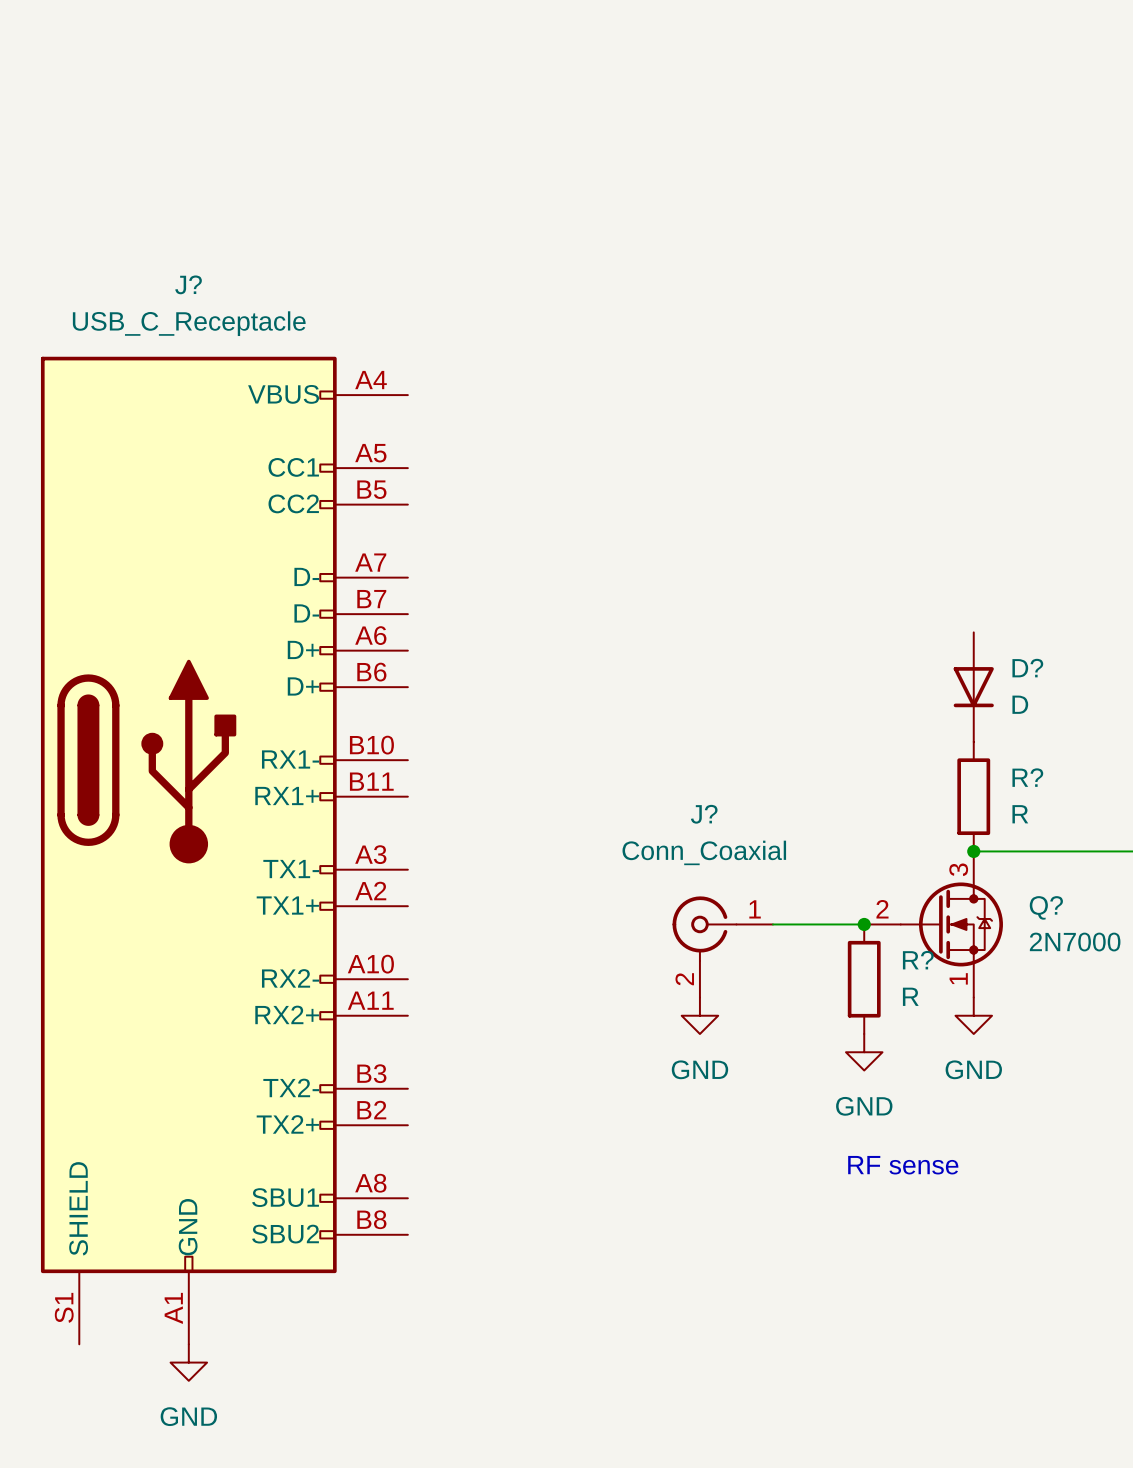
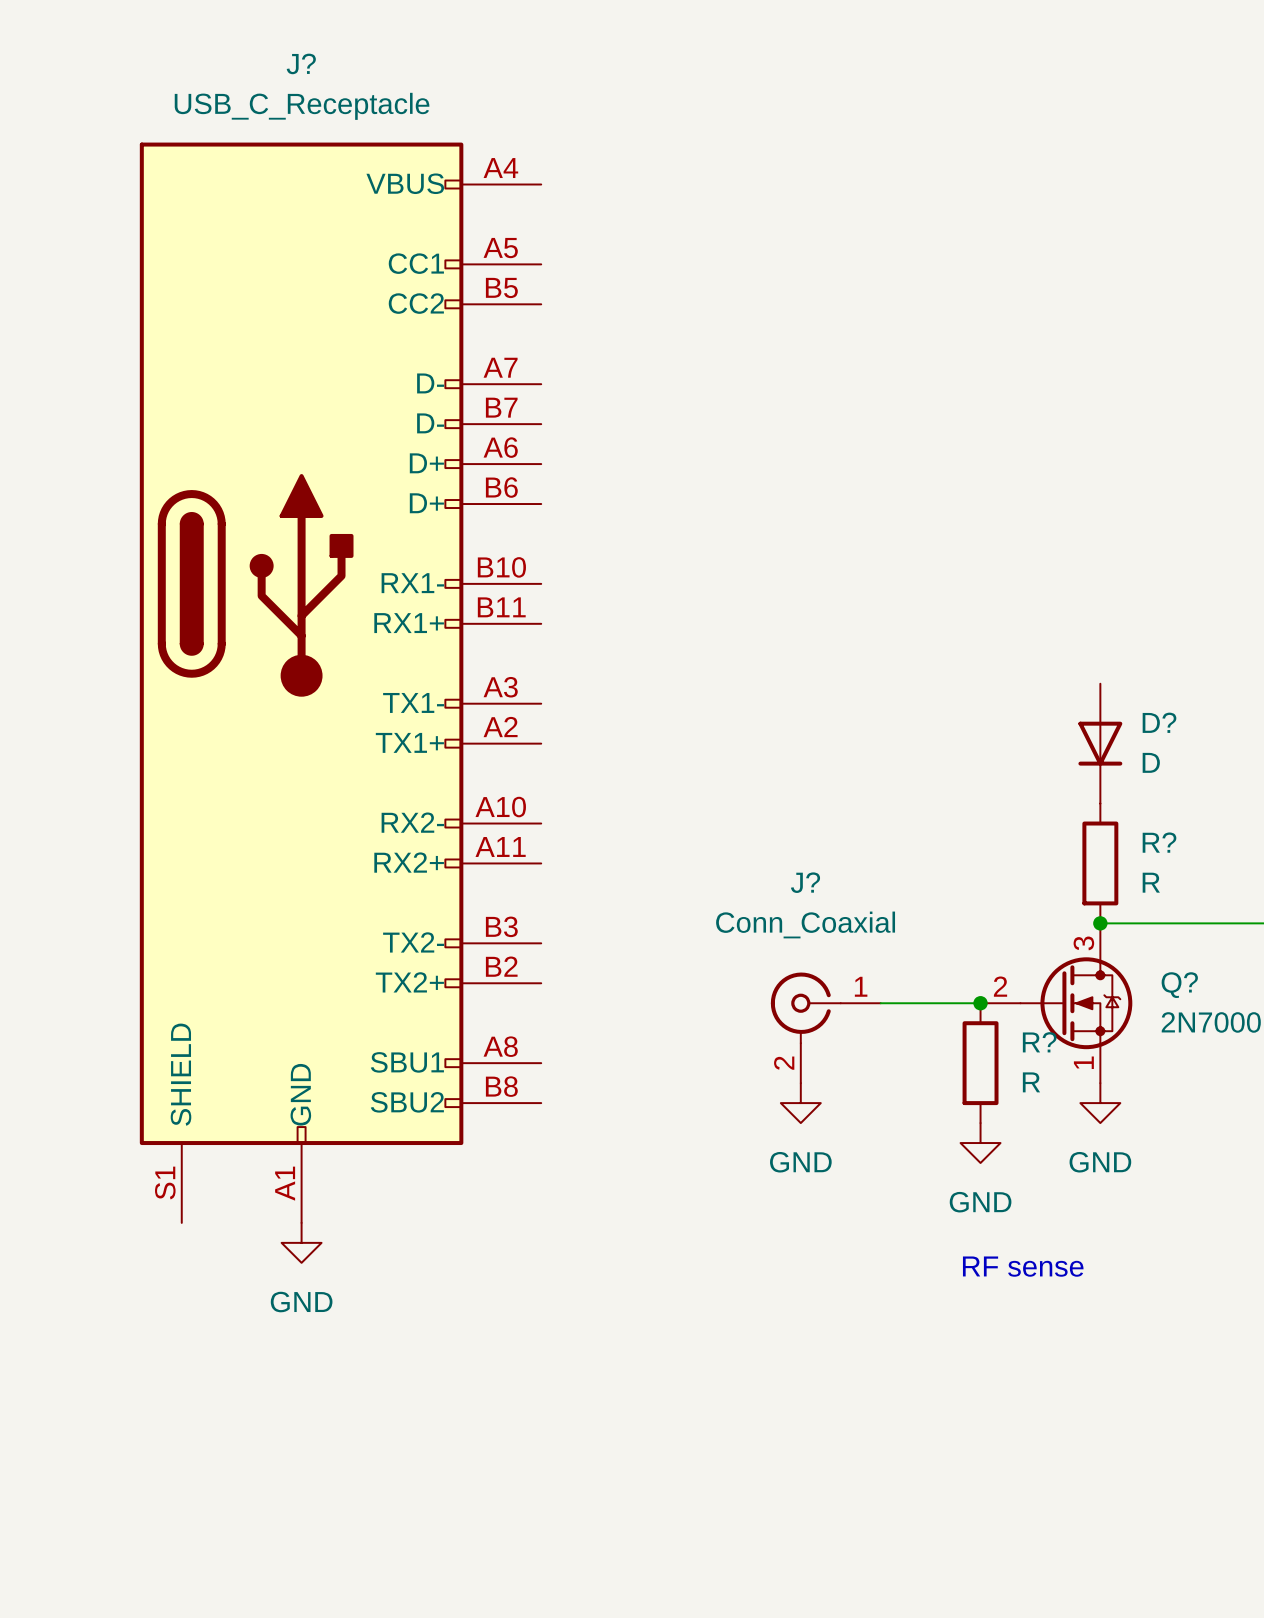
J? position: (224, 850) -> (340, 682)
power symbol position: GND (188, 1362) -> GND (301, 1242)

